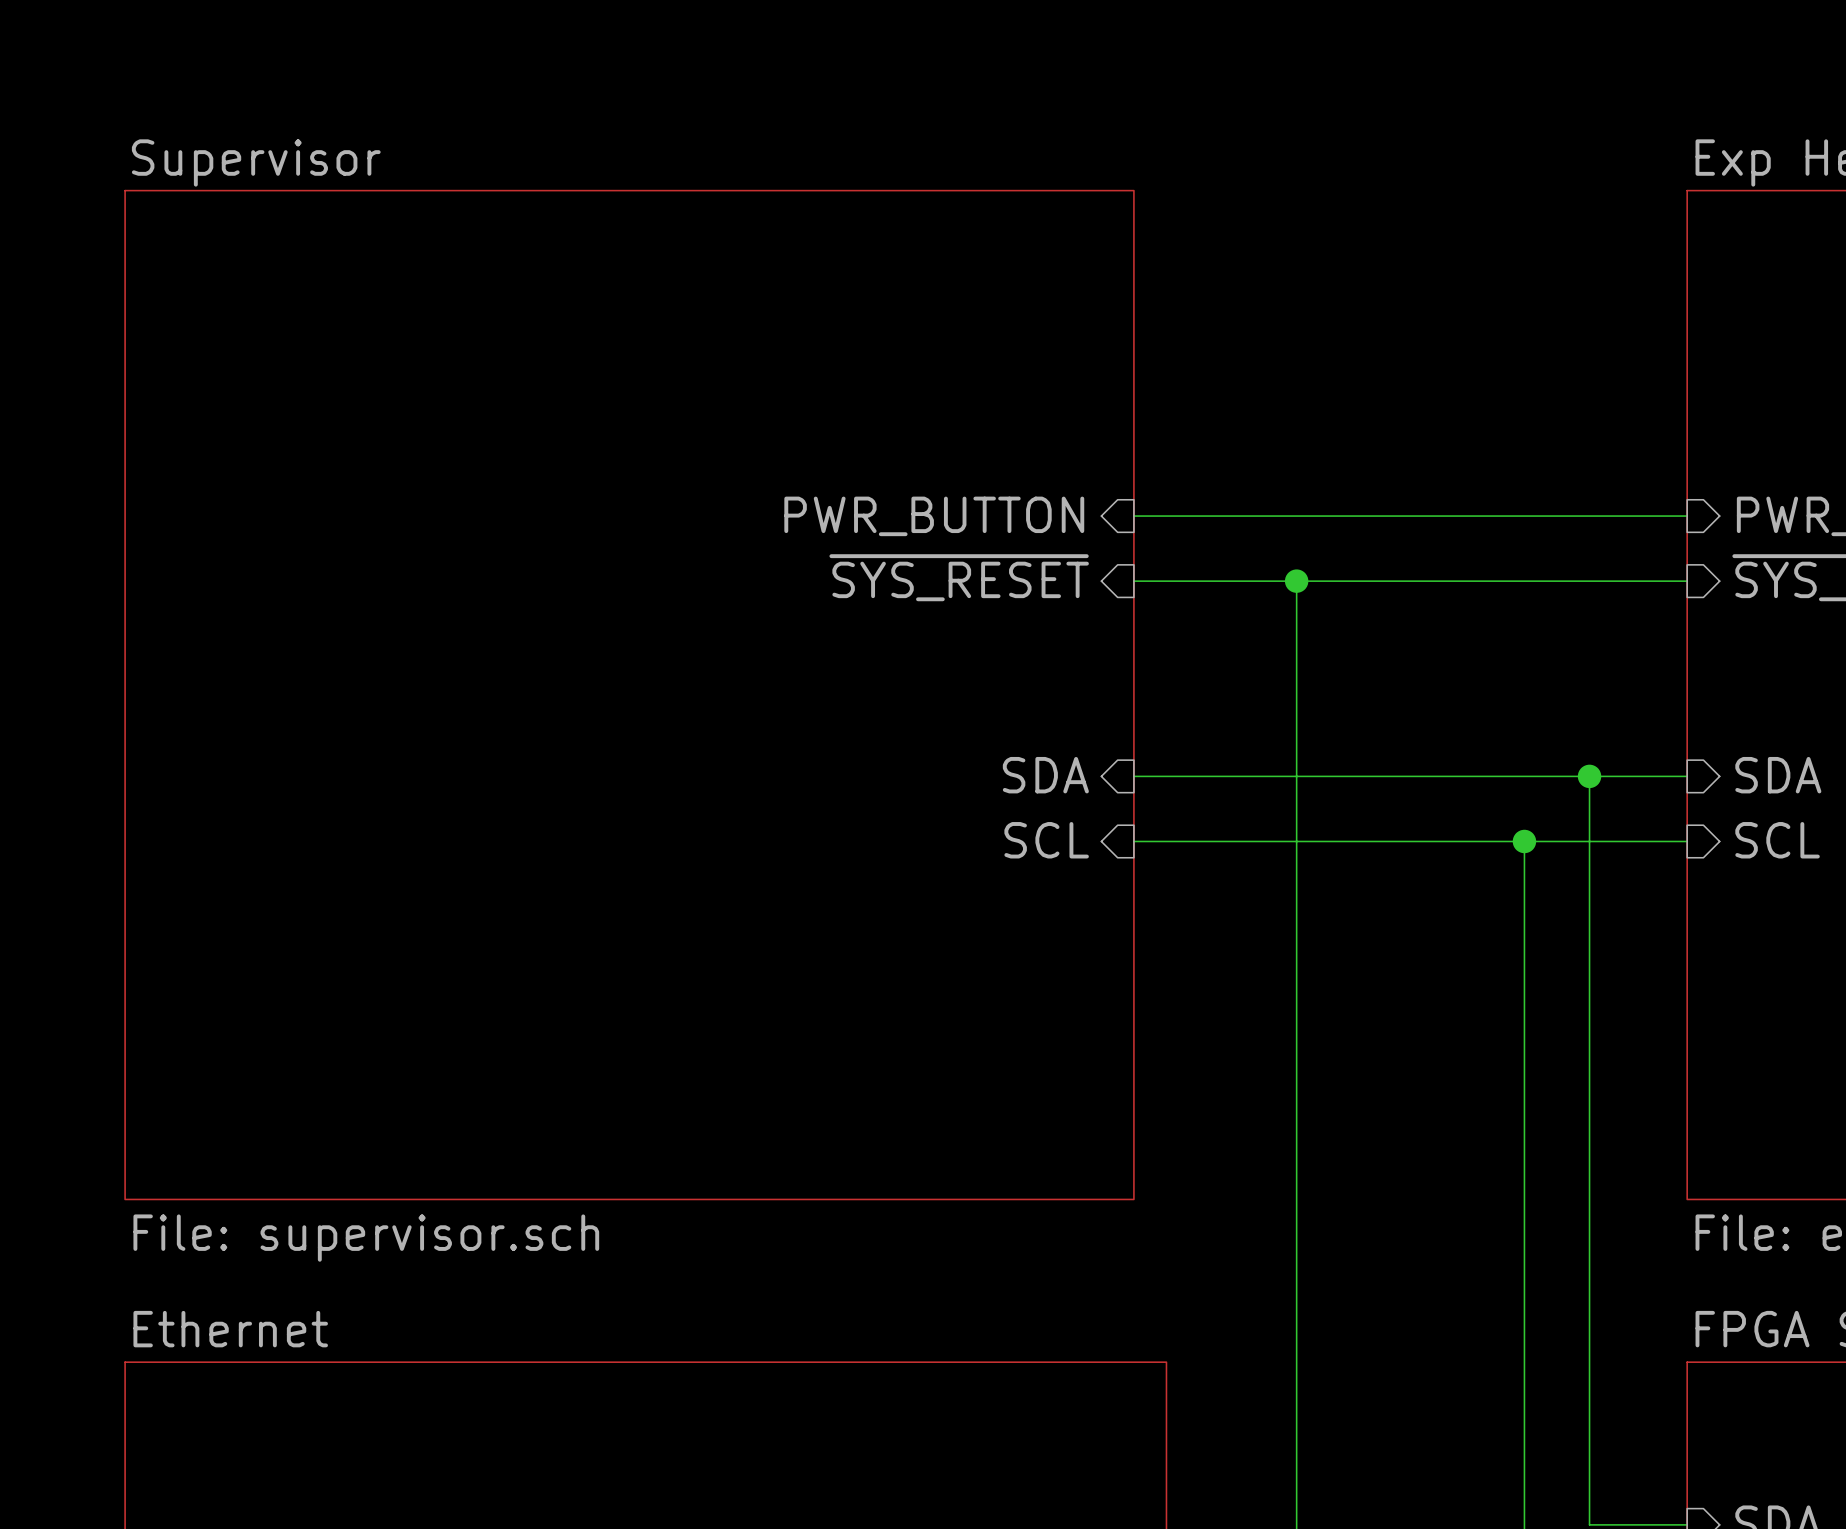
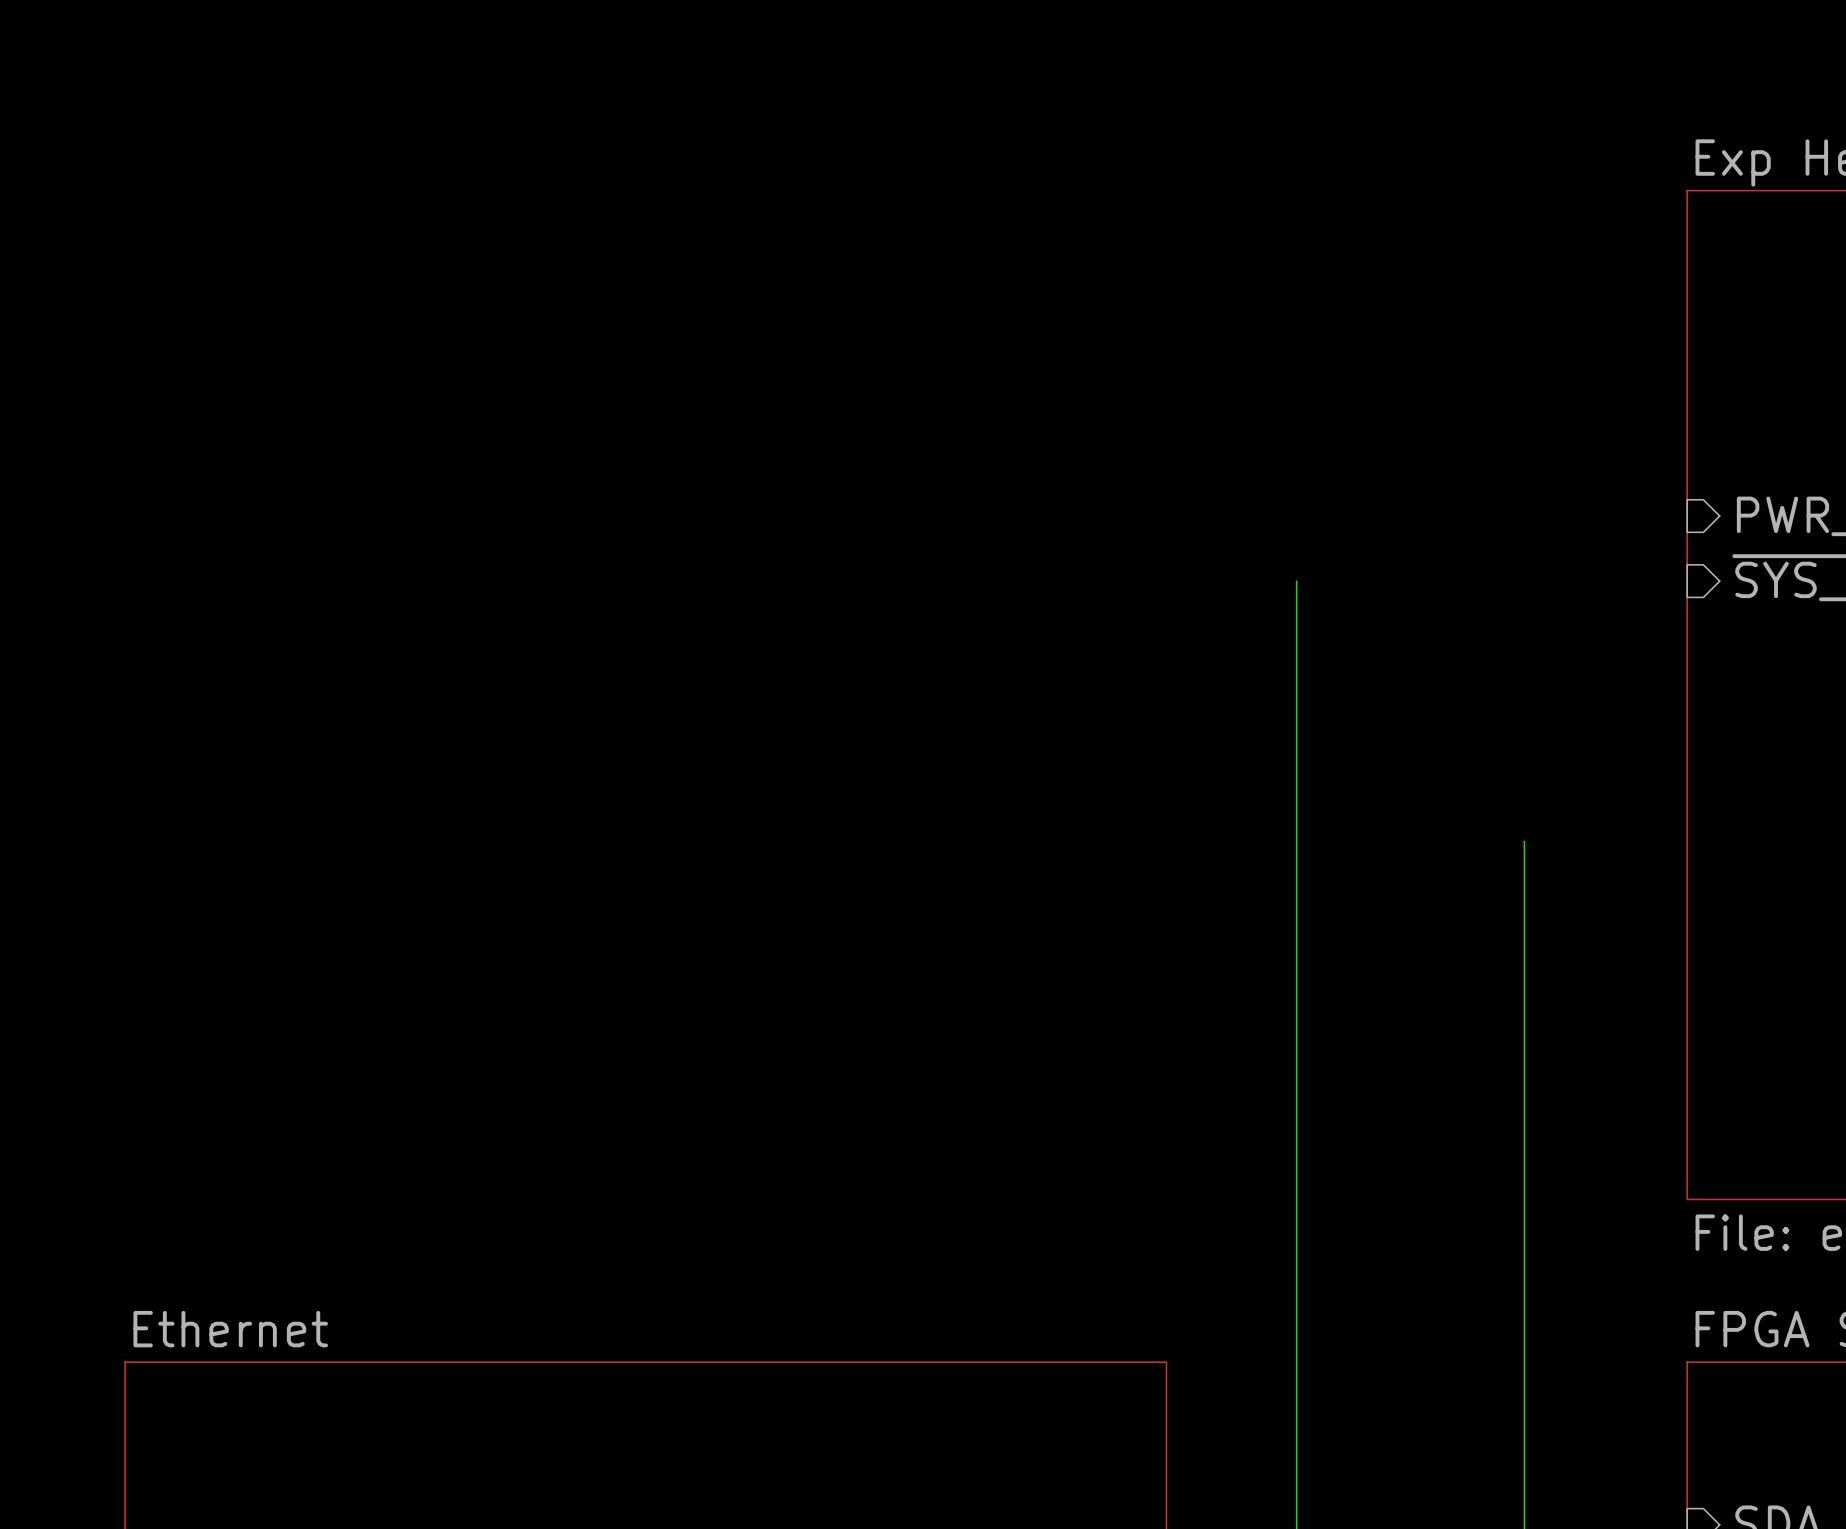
sheet pin: PWR_BUTTON (934, 516) -> none
wire: (1133, 516) (1687, 516) -> none
sheet pin: ~{SYS_RESET} (959, 577) -> none
wire: (1133, 581) (1687, 581) -> none
junction: (1296, 581) -> none
sheet Supervisor: File: supervisor.sch (629, 695) -> none
sheet pin: SDA (1045, 775) -> none
sheet pin: SDA (1778, 775) -> none
wire: (1133, 776) (1687, 776) -> none
wire: (1589, 776) (1589, 1524) (1687, 1524) -> none
junction: (1589, 776) -> none
sheet pin: SCL (1046, 840) -> none
sheet pin: SCL (1777, 840) -> none
wire: (1133, 841) (1687, 841) -> none
junction: (1524, 841) -> none

